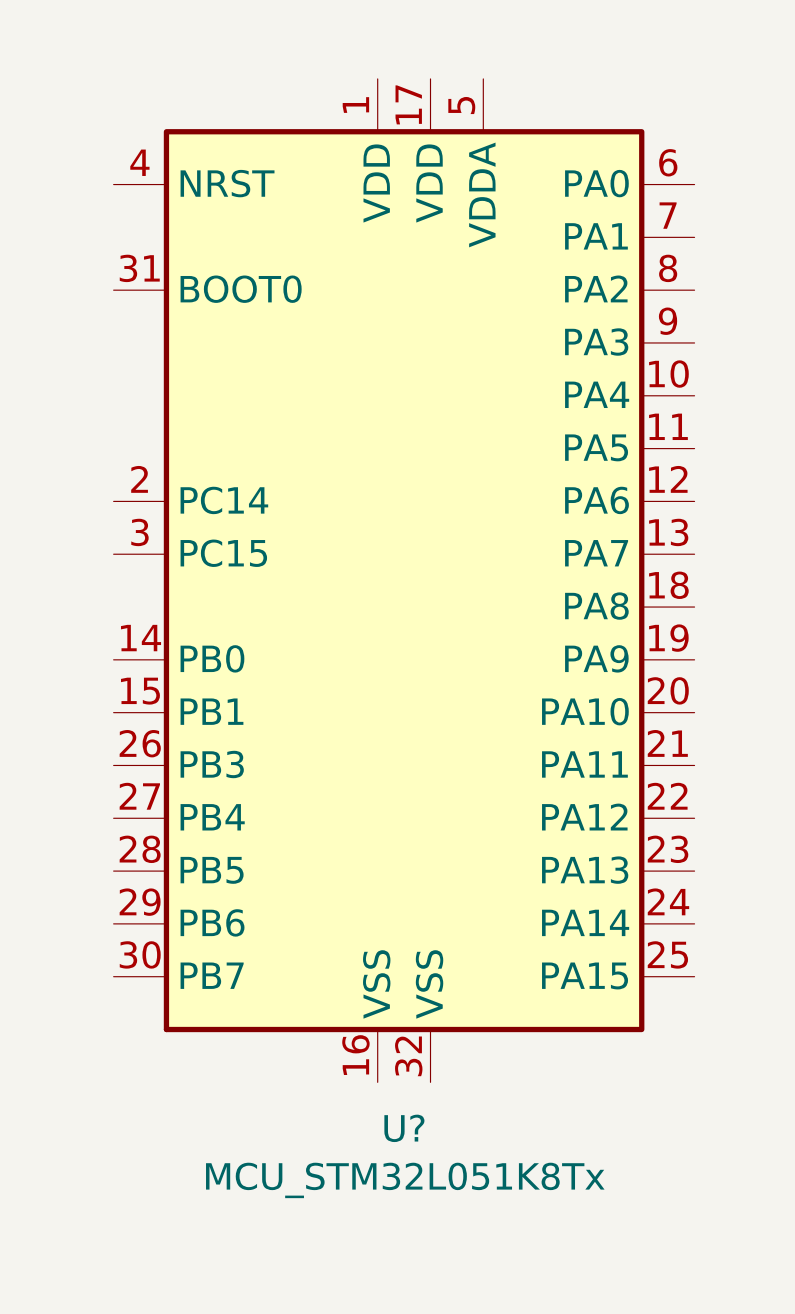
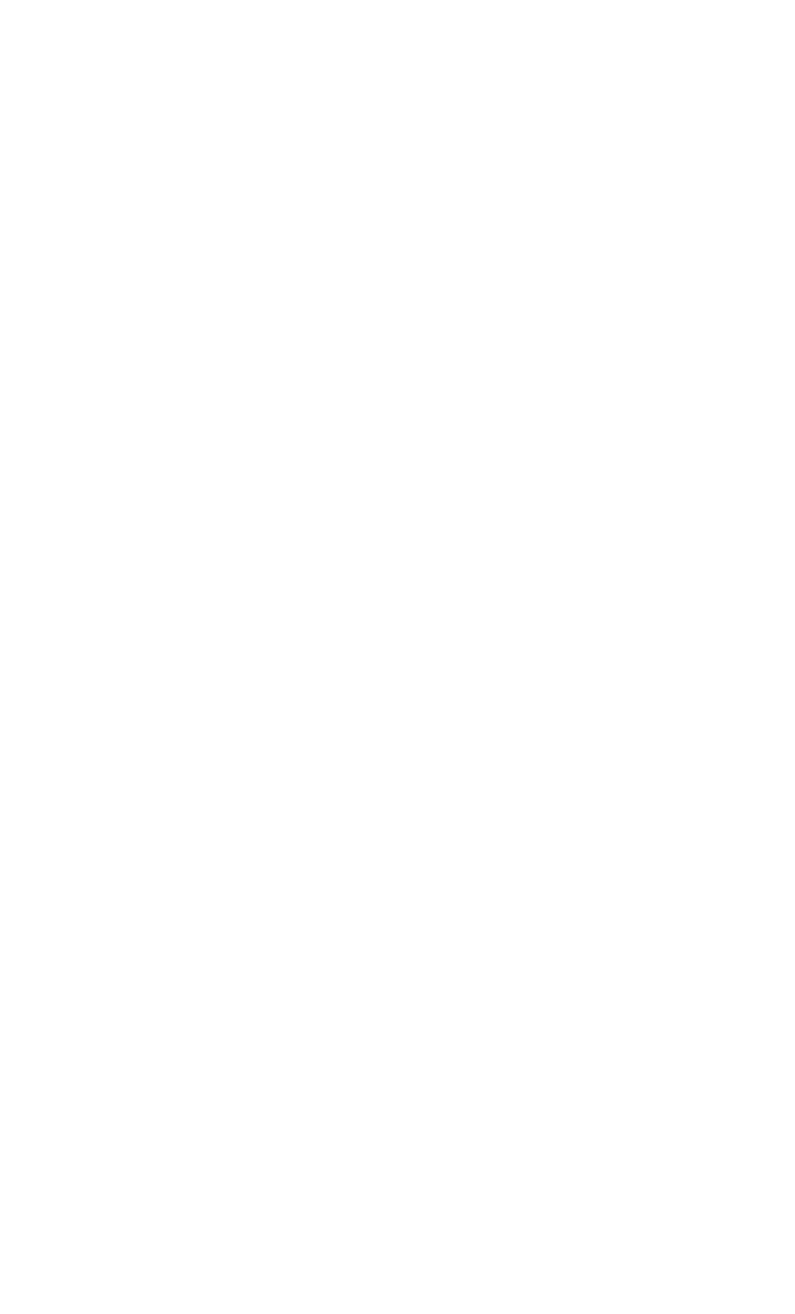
U?: MCU_STM32L051K8Tx (404, 580) -> none

